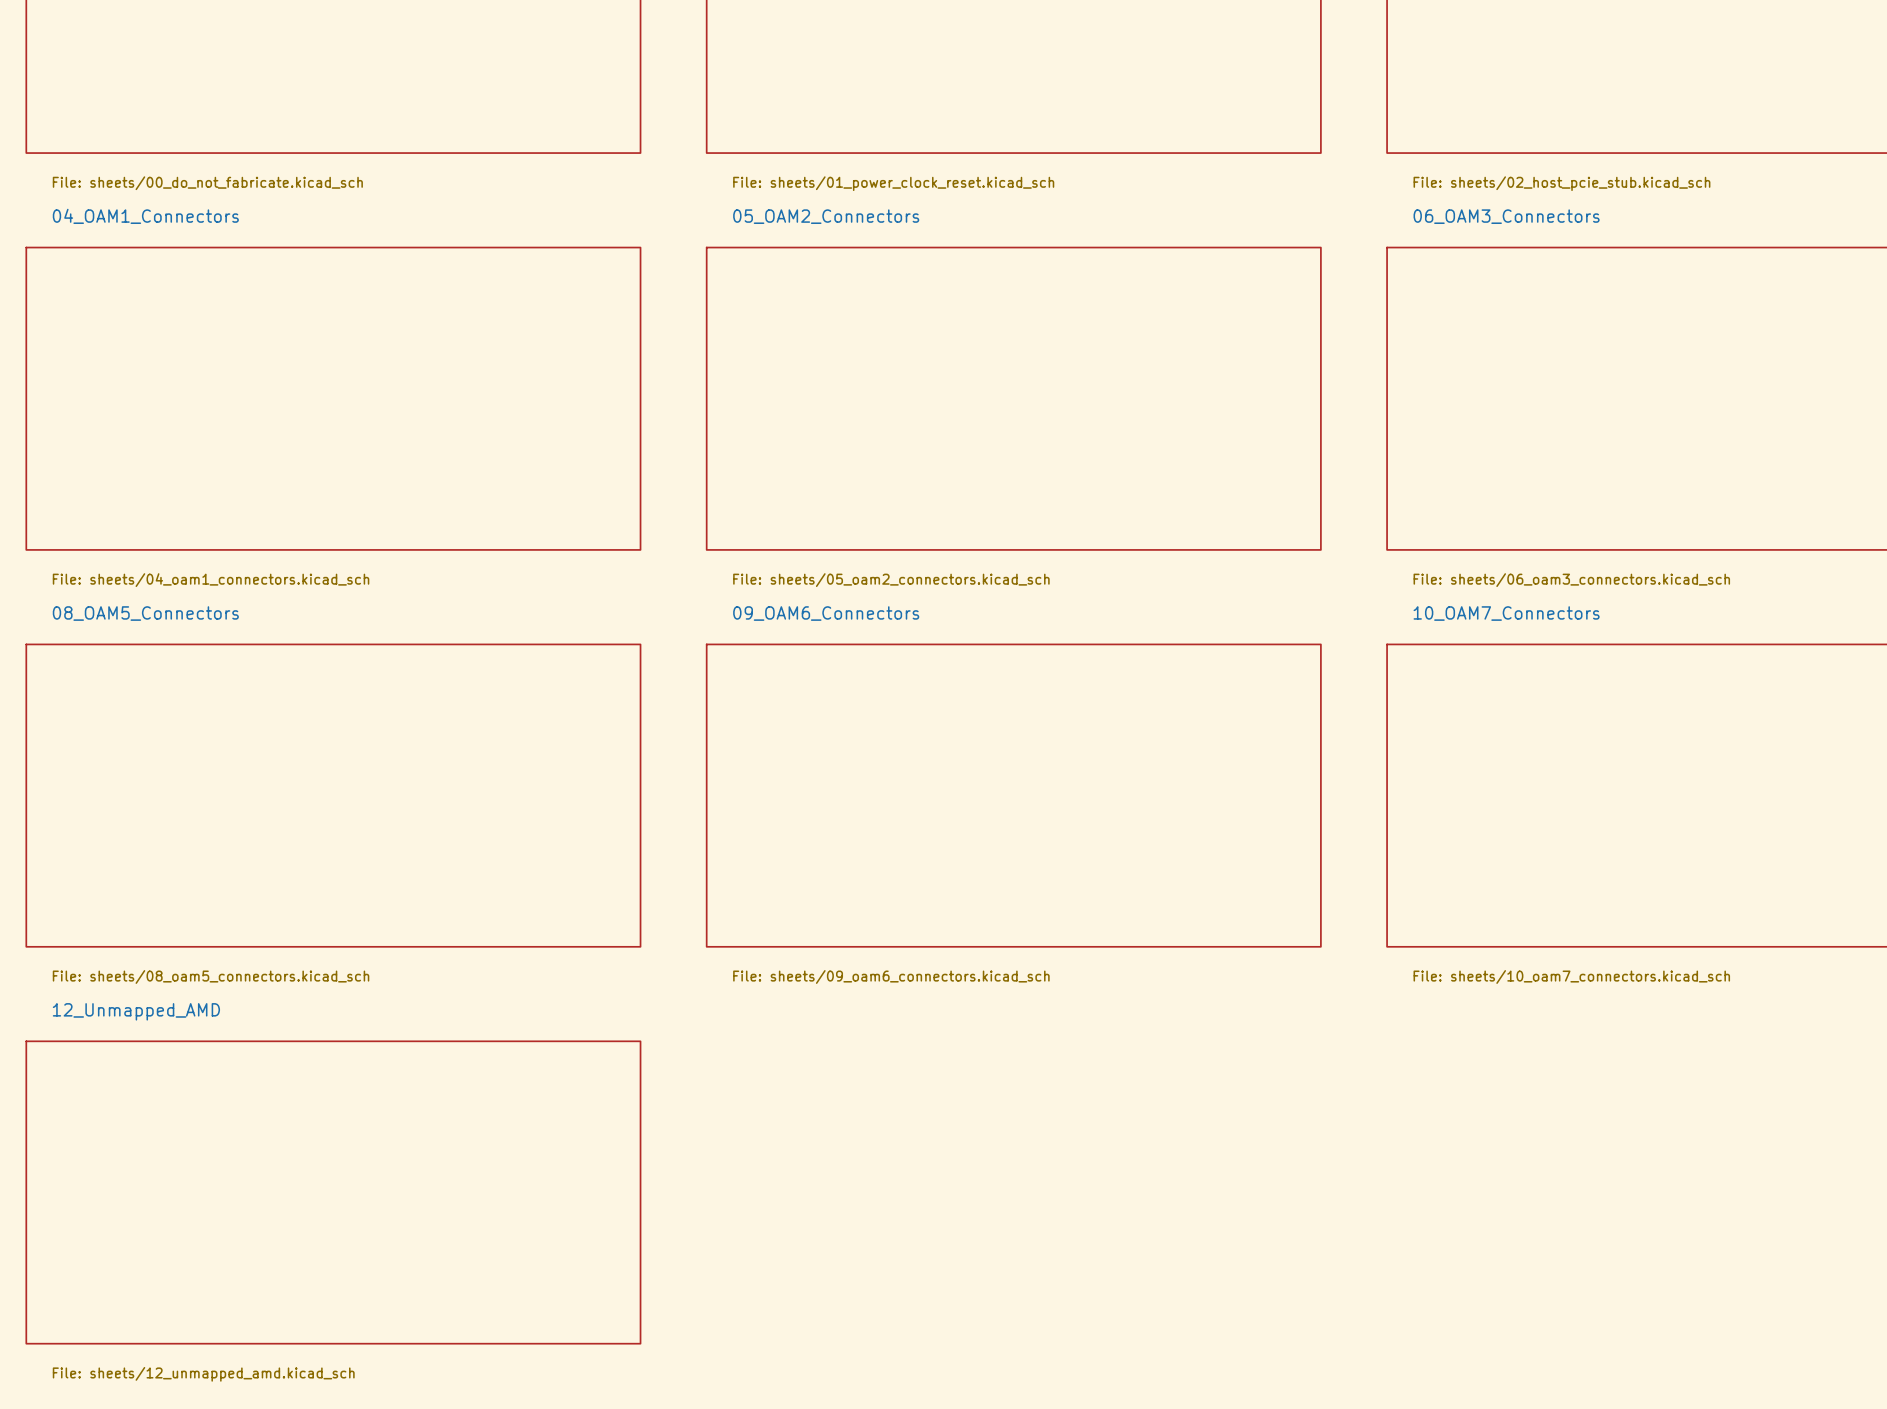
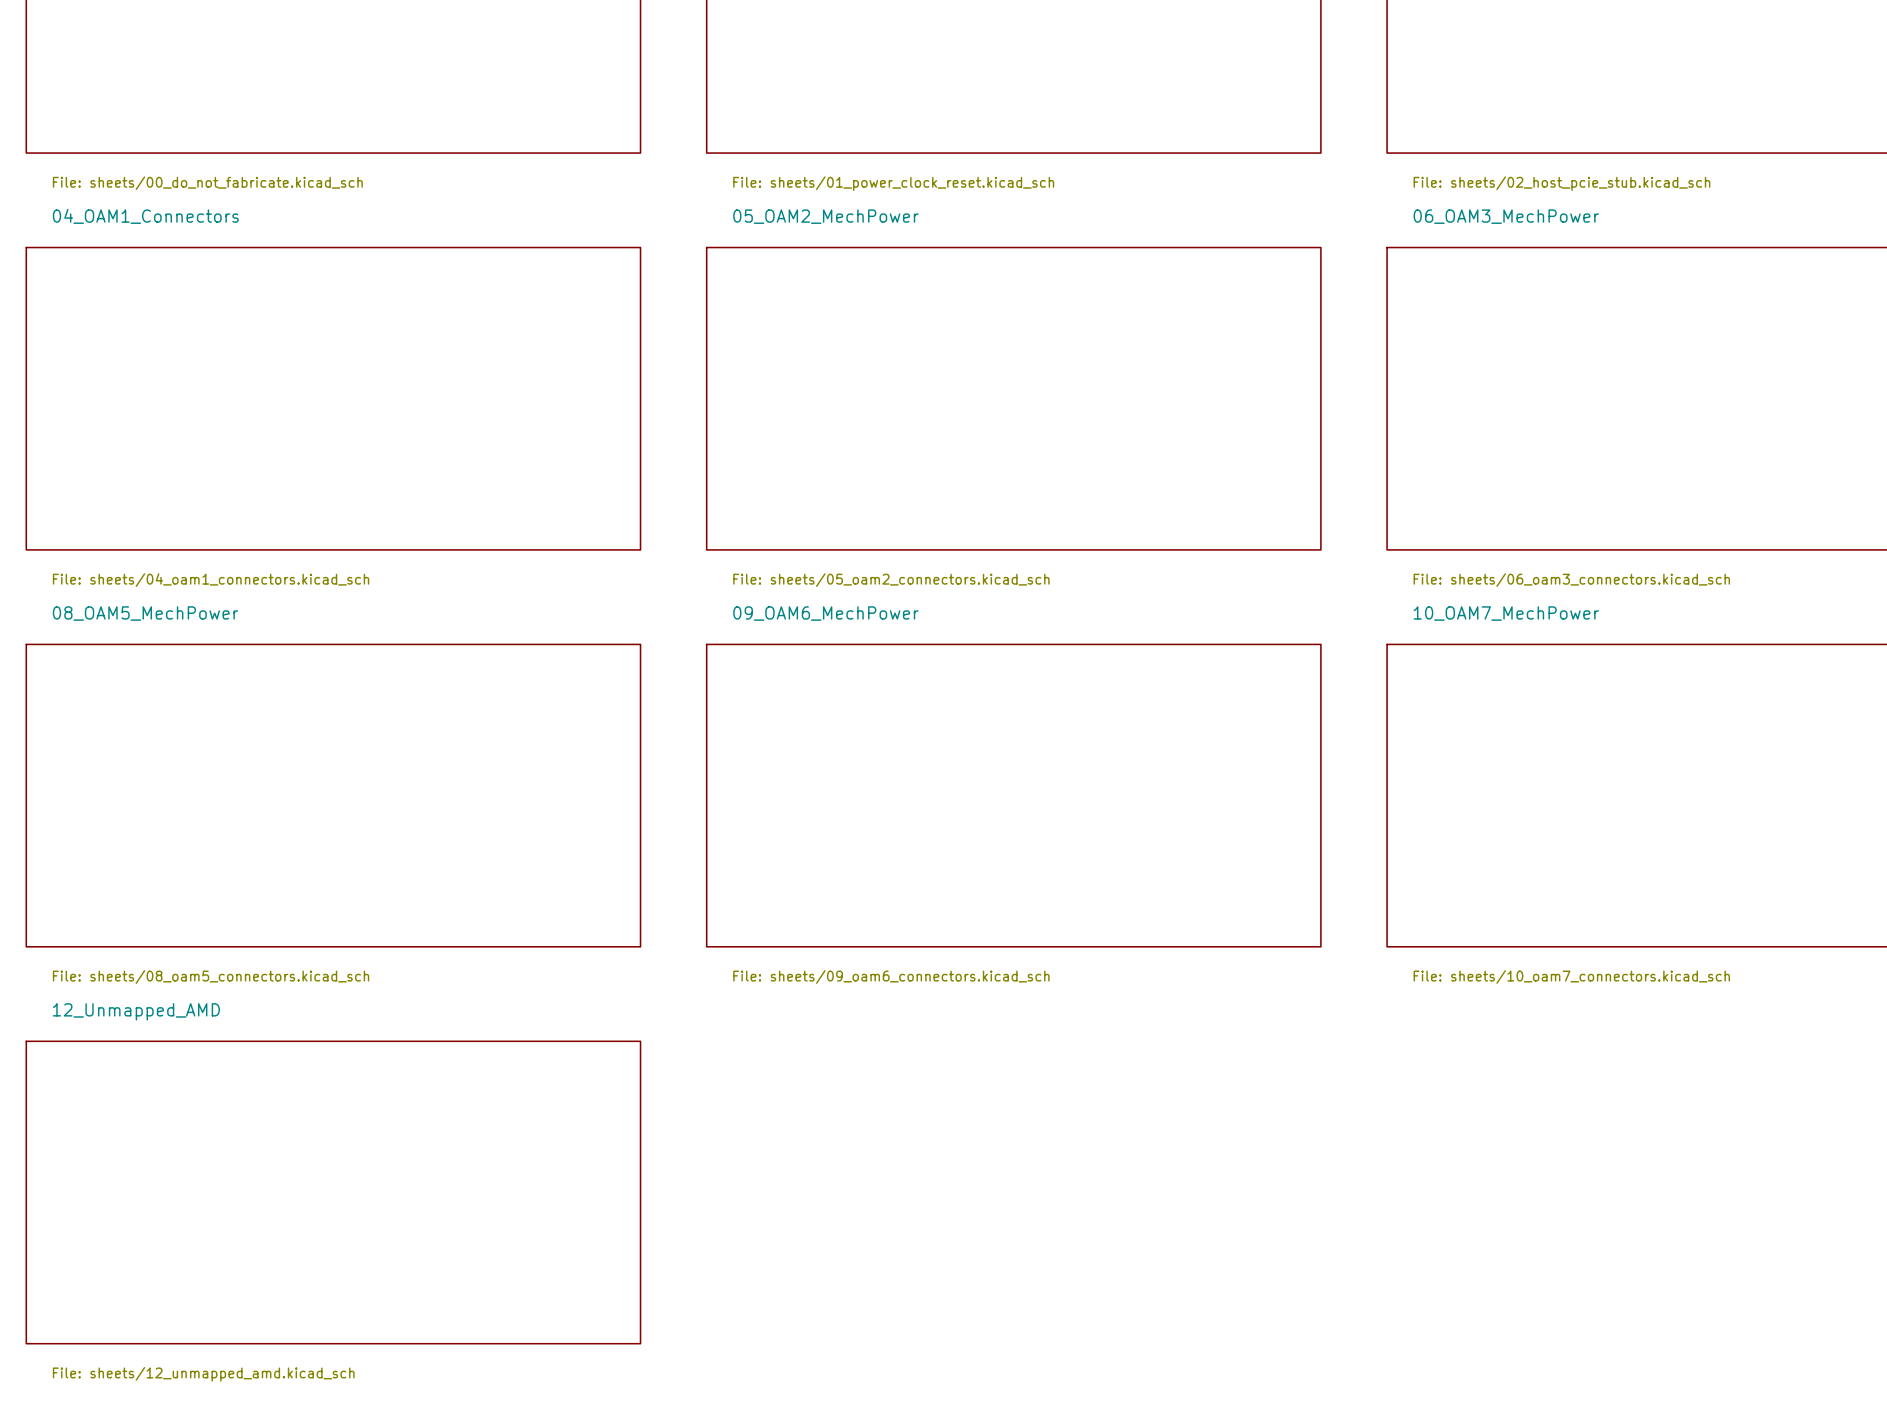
sheet 05_OAM2_Connectors name: 05_OAM2_Connectors (826, 216) -> 05_OAM2_MechPower (825, 216)
sheet 06_OAM3_Connectors name: 06_OAM3_Connectors (1506, 216) -> 06_OAM3_MechPower (1506, 216)
sheet 08_OAM5_Connectors name: 08_OAM5_Connectors (145, 613) -> 08_OAM5_MechPower (145, 613)
sheet 09_OAM6_Connectors name: 09_OAM6_Connectors (826, 613) -> 09_OAM6_MechPower (825, 613)
sheet 10_OAM7_Connectors name: 10_OAM7_Connectors (1506, 613) -> 10_OAM7_MechPower (1506, 613)

